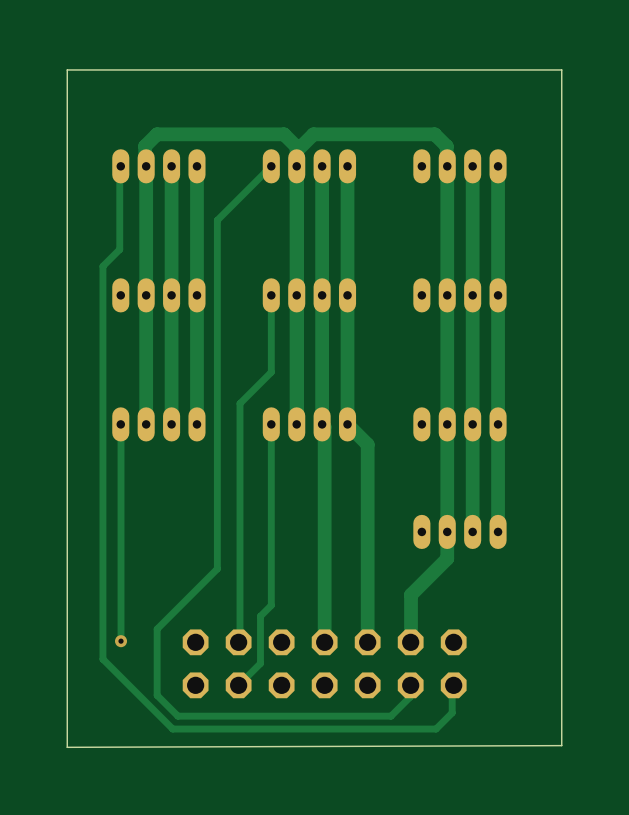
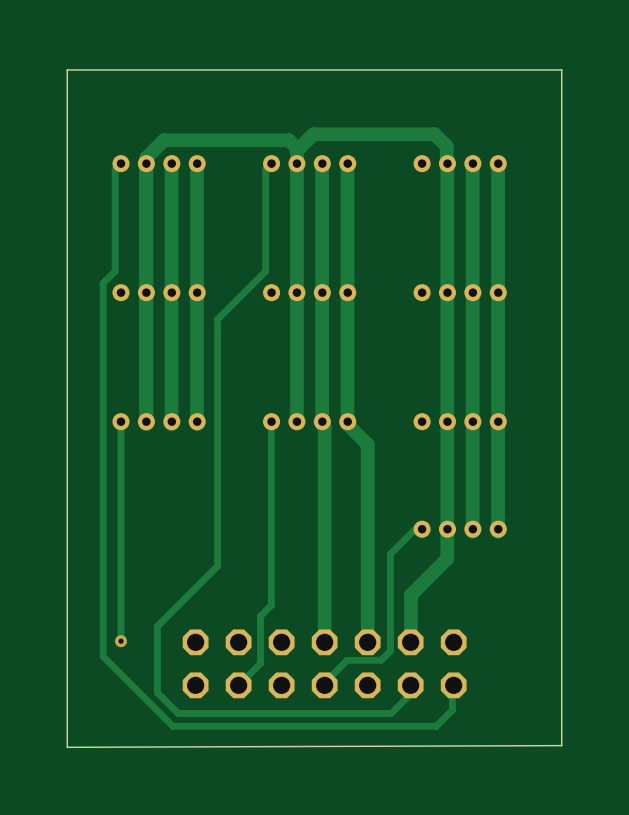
part footprint: [112, 149, 206, 184] -> [112, 155, 206, 173]
part footprint: [262, 149, 357, 184] -> [263, 155, 357, 173]
part footprint: [413, 149, 507, 184] -> [413, 155, 507, 173]
track: none -> (121, 163) (115, 168) (115, 271) (103, 283) (103, 656) (172, 726) (436, 726) (452, 710) (453, 682)
track: none -> (271, 163) (265, 168) (265, 271) (217, 319) (217, 566) (157, 626) (157, 692) (178, 713) (391, 713) (410, 694) (410, 682)
track: (120, 166) (119, 249) (102, 266) (102, 659) (172, 729) (436, 729) (452, 712) (453, 685) -> none
track: (146, 166) (145, 146) (157, 134) (284, 134) (296, 147) (296, 424) -> none
track: (265, 171) (271, 166) (217, 220) (217, 568) (157, 629) (157, 695) (177, 716) (391, 716) (410, 697) (410, 685) -> none
part footprint: [112, 278, 206, 313] -> [112, 284, 206, 302]
part footprint: [262, 278, 357, 313] -> [263, 284, 357, 302]
part footprint: [413, 278, 507, 313] -> [413, 284, 507, 302]
track: (271, 295) (271, 372) (239, 403) (238, 642) -> none
part footprint: [112, 407, 206, 442] -> [112, 413, 206, 431]
part footprint: [262, 407, 357, 442] -> [263, 413, 357, 431]
part footprint: [413, 407, 507, 442] -> [413, 413, 507, 431]
track: none -> (296, 421) (296, 148) (288, 140) (164, 140) (146, 157) (146, 421)
part footprint: [413, 514, 507, 550] -> [413, 520, 507, 538]
track: none -> (422, 529) (415, 529) (390, 554) (390, 650) (381, 660) (347, 660) (324, 682)

